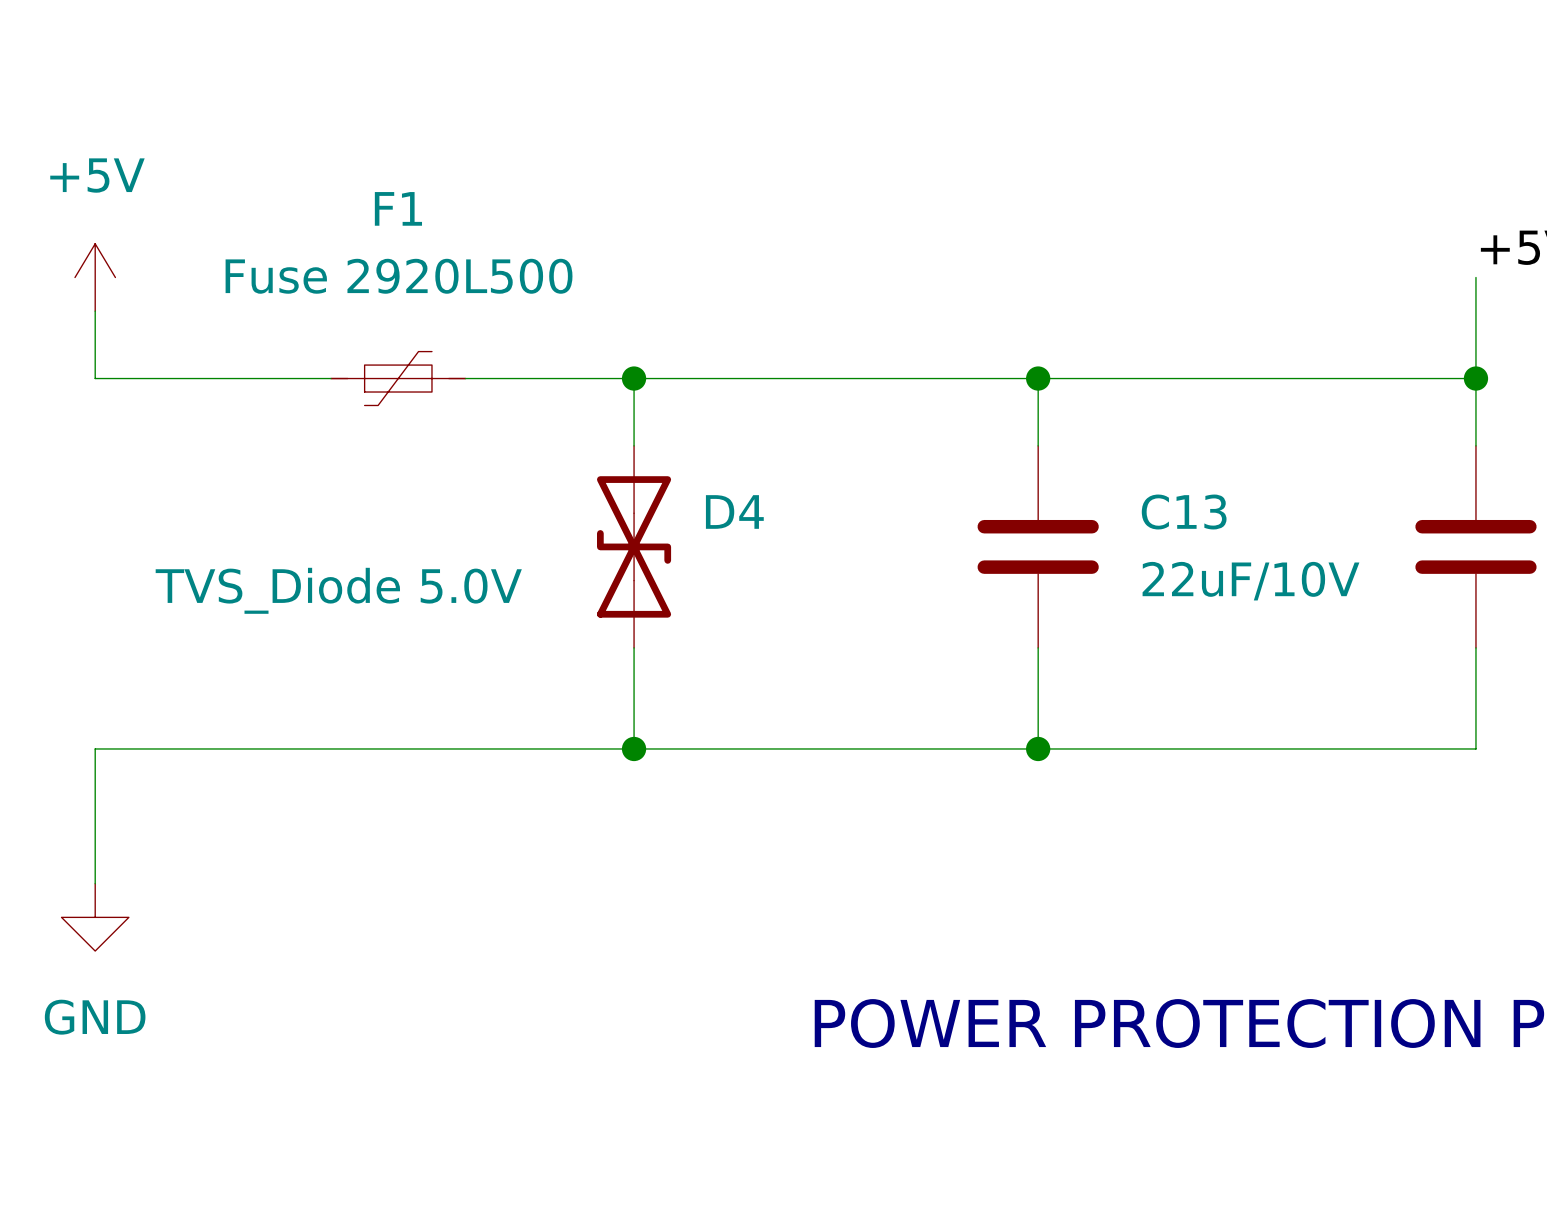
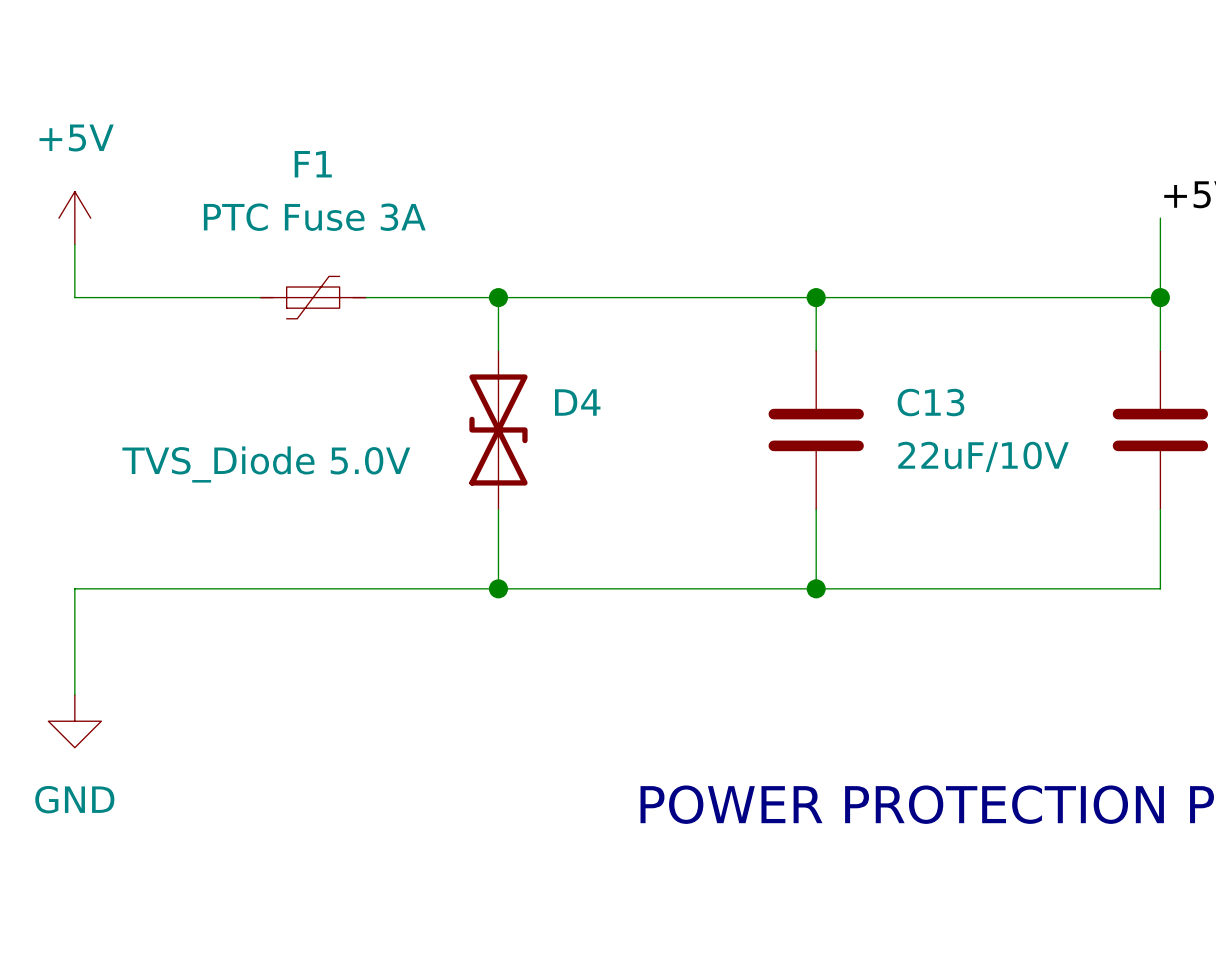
F1 value: Fuse 2920L500 (399, 276) -> PTC Fuse 3A (314, 217)

